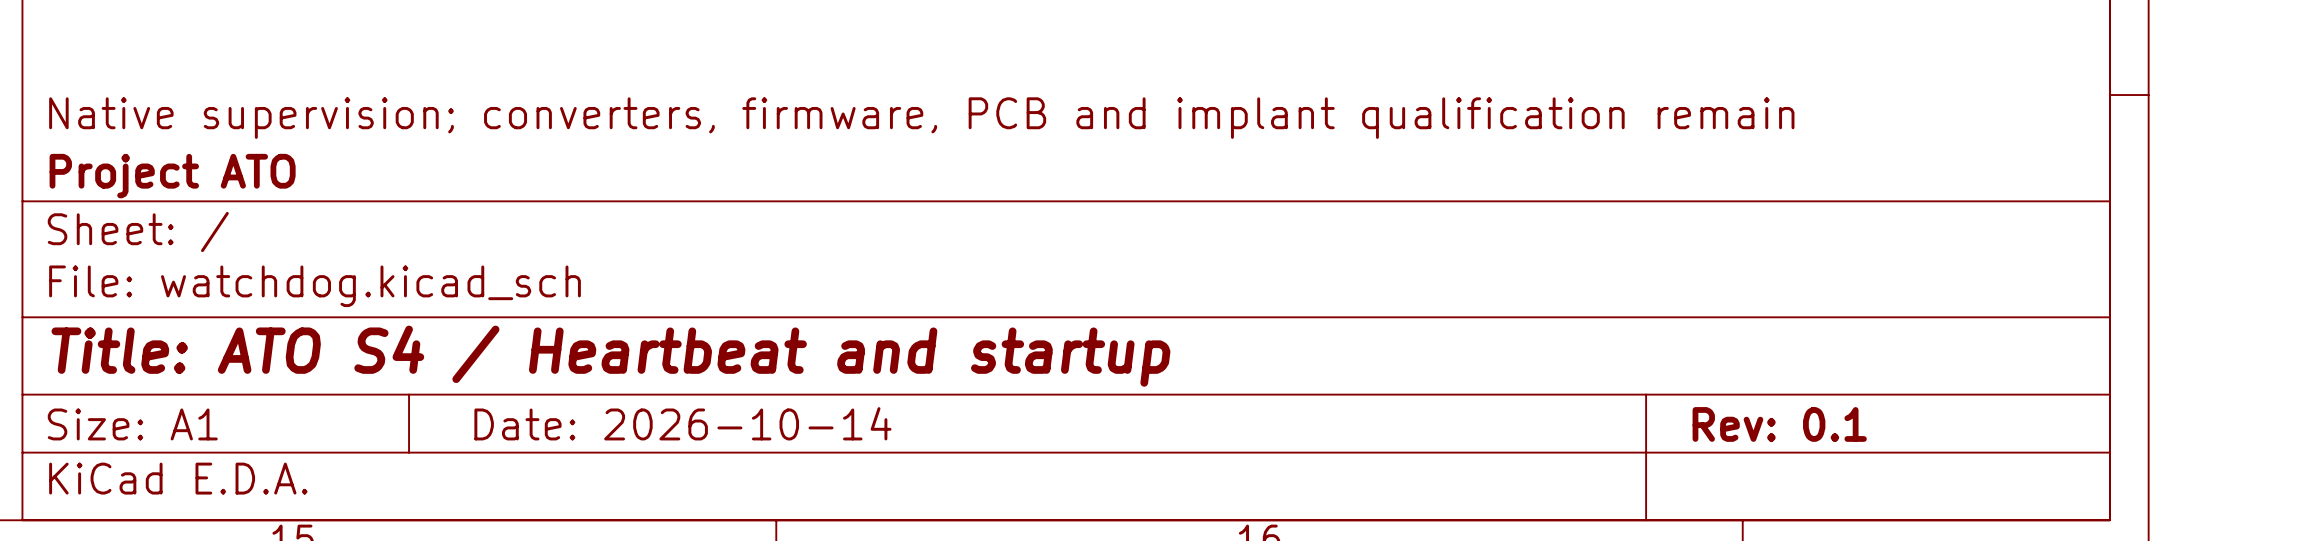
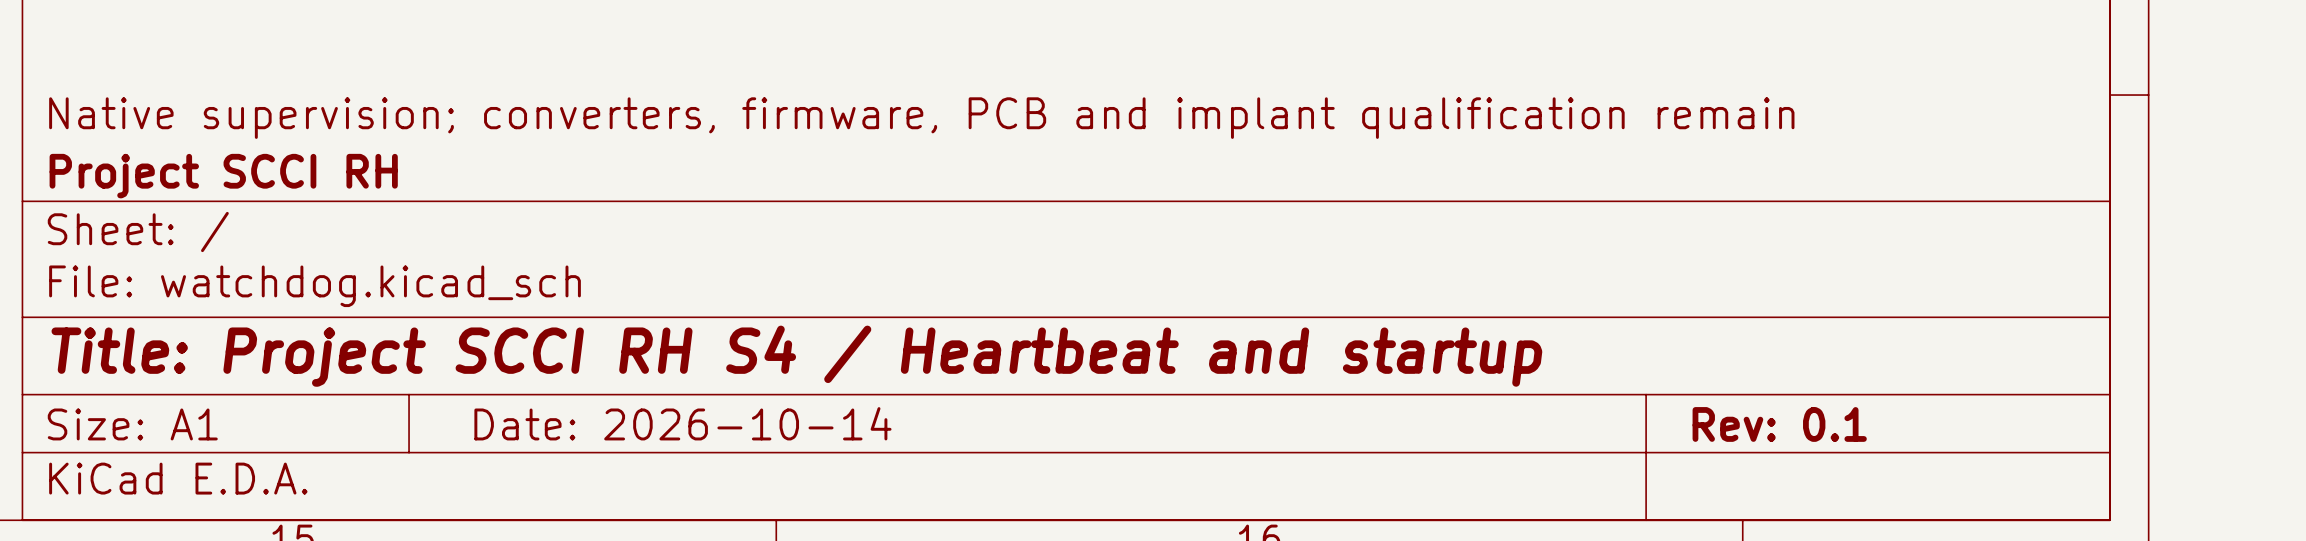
title block: Project ATO (172, 176) -> Project SCCI RH (223, 176)
title block: Title: ATO S4 / Heartbeat and startup (610, 356) -> Title: Project SCCI RH S4 / Heartbeat and startup (796, 356)

